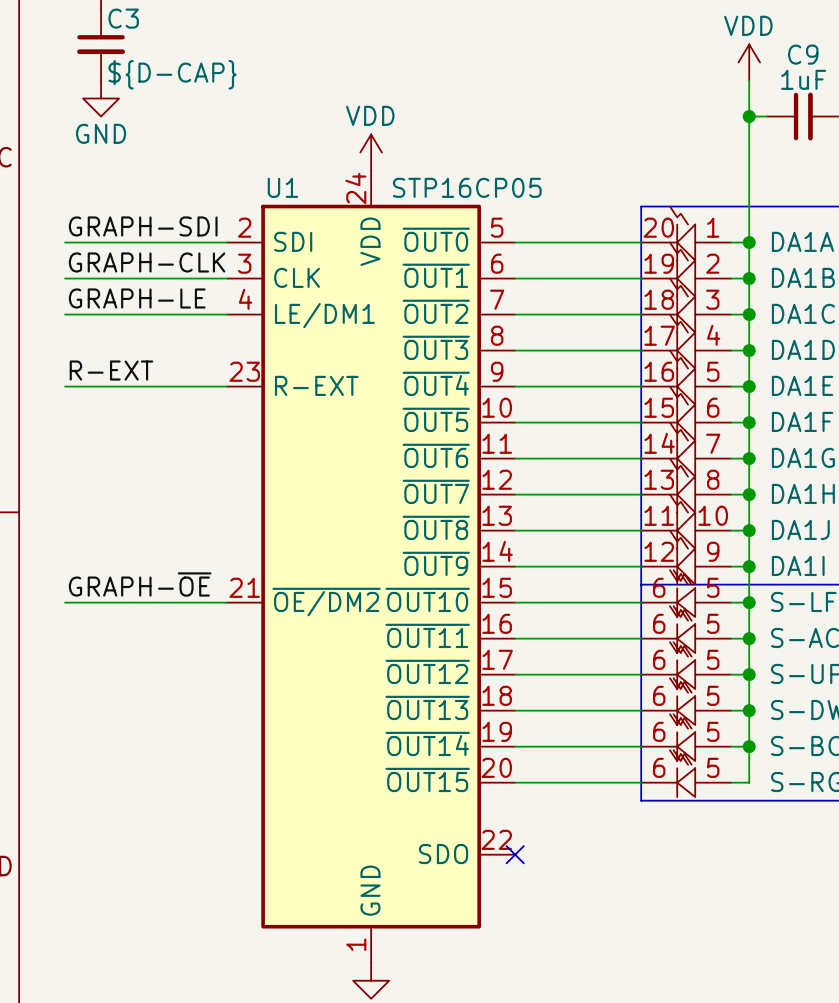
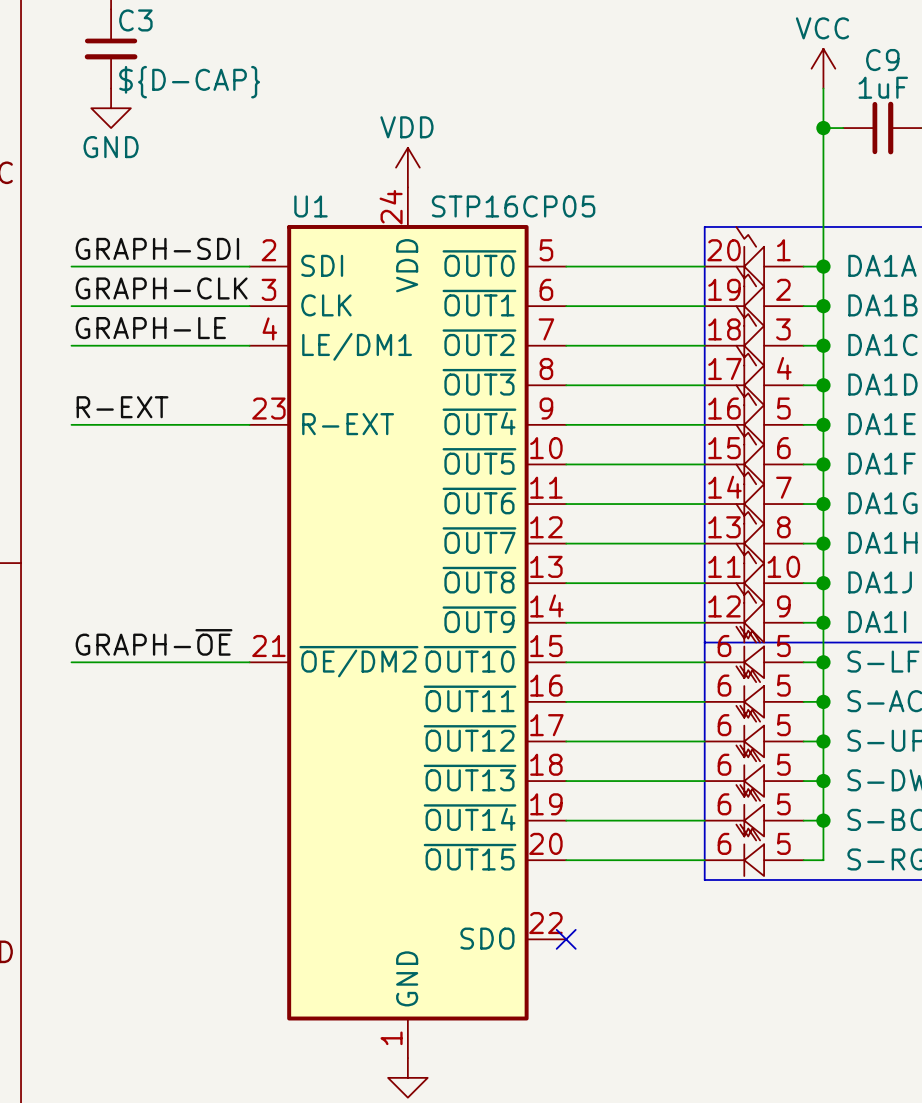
power symbol: VDD (749, 62) -> VCC (823, 68)

